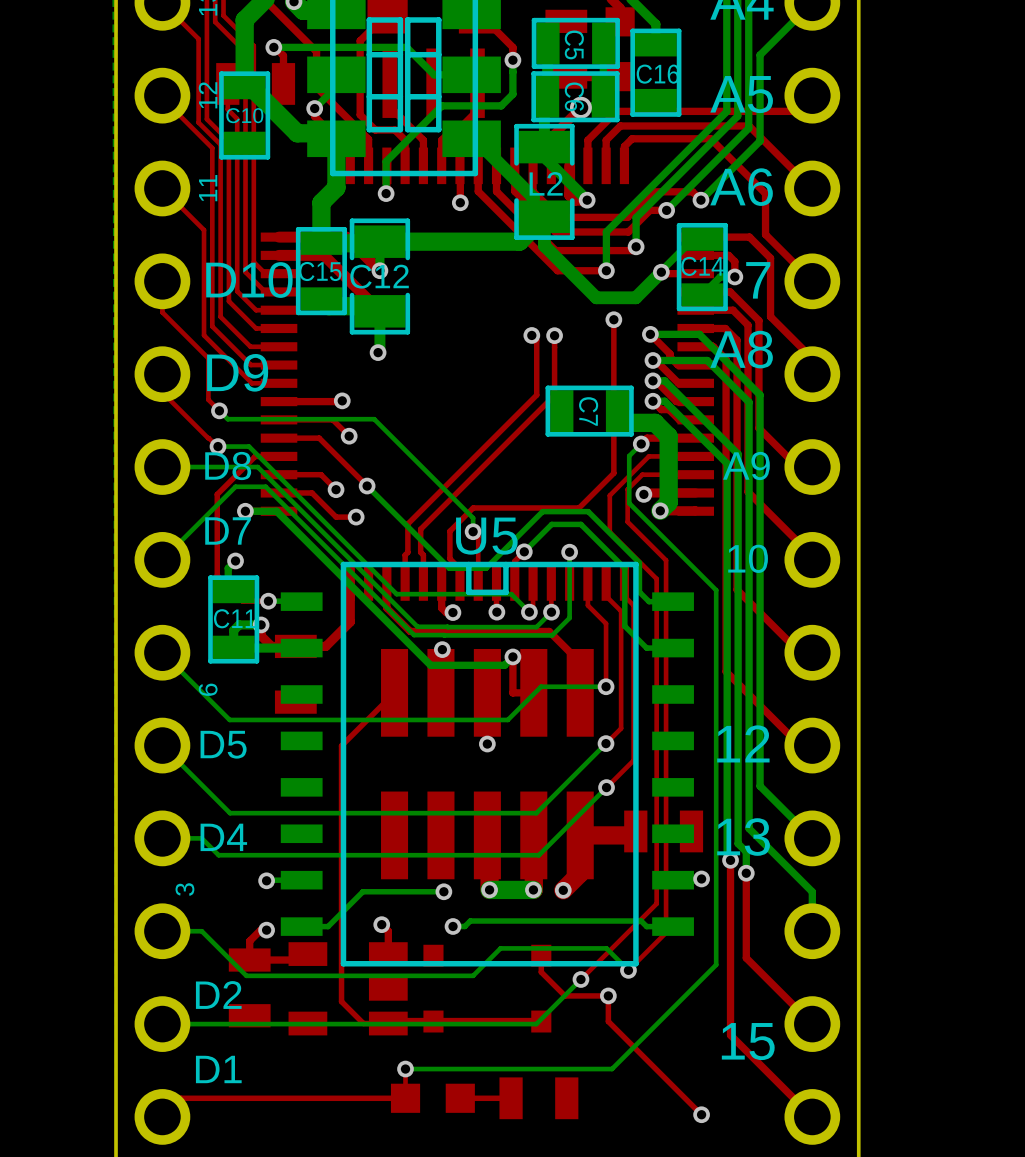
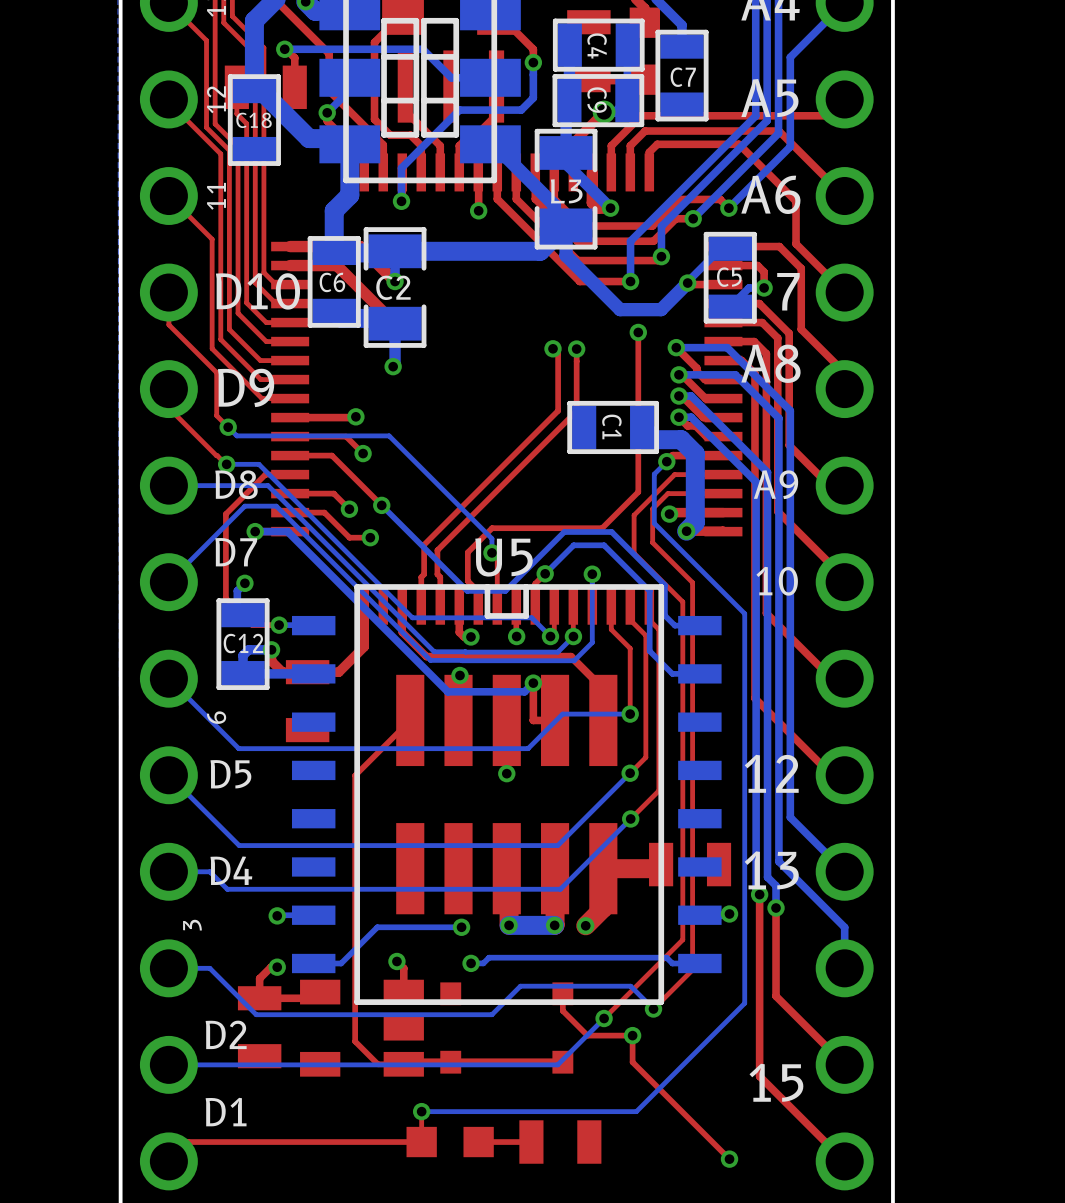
C5 name: C5 (574, 44) -> C4 (597, 46)
C16 name: C16 (657, 74) -> C7 (683, 77)
C6 name: C6 (574, 96) -> C9 (597, 100)
C10 name: C10 (244, 115) -> C18 (254, 120)
L2 name: L2 (546, 183) -> L3 (566, 191)
C14 name: C14 (702, 266) -> C5 (729, 277)
C15 name: C15 (320, 271) -> C6 (332, 282)
C12 name: C12 (379, 276) -> C2 (393, 287)
C7 name: C7 (588, 411) -> C1 (611, 426)
C11 name: C11 (235, 618) -> C12 (243, 643)

